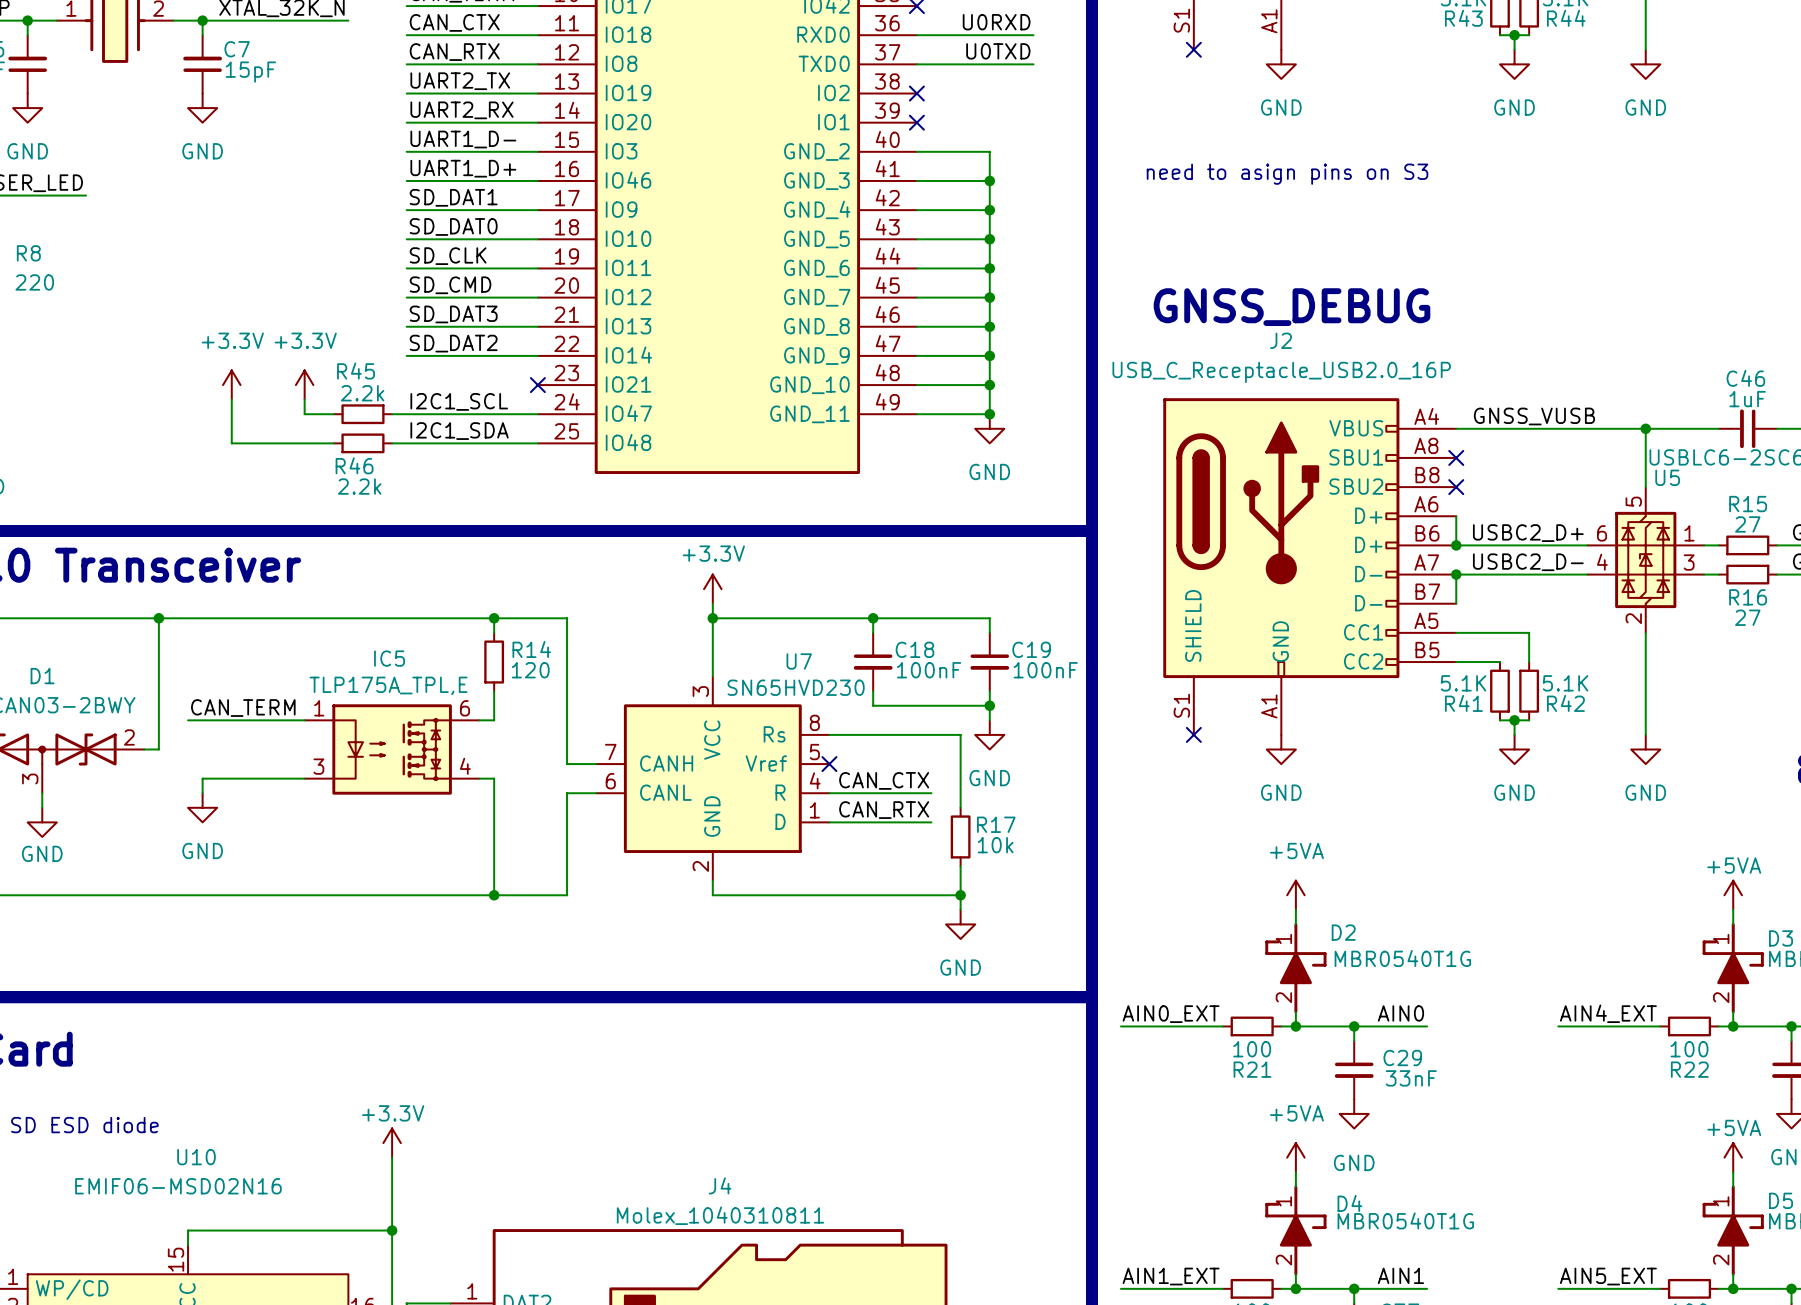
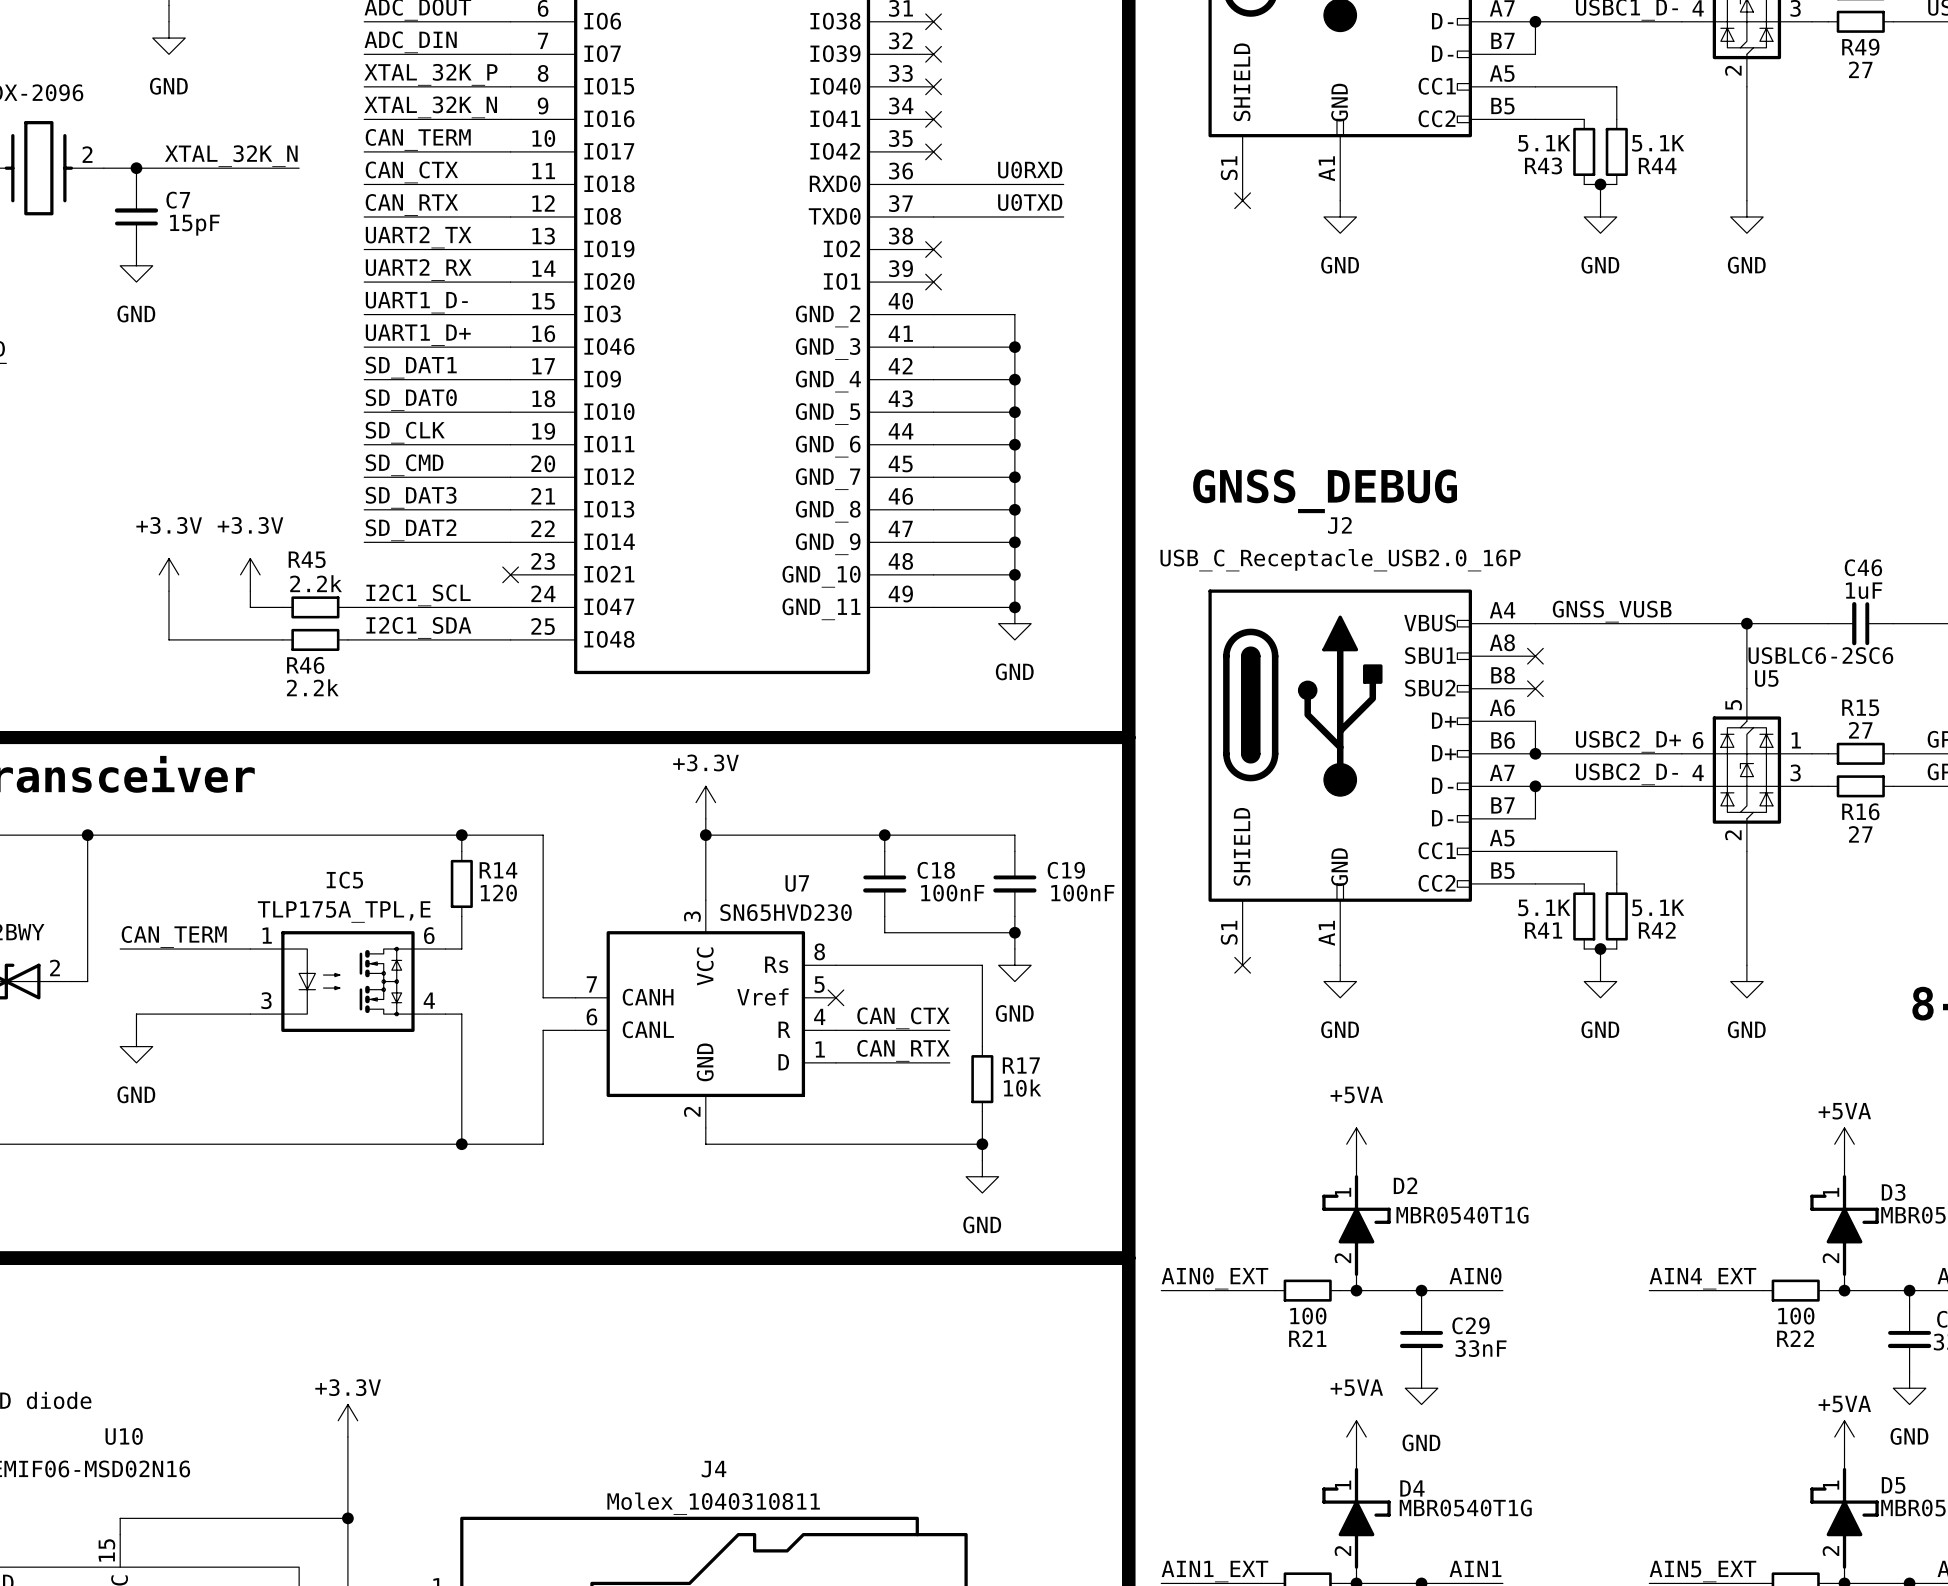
text: need to asign pins on S3 (1287, 174) -> none

